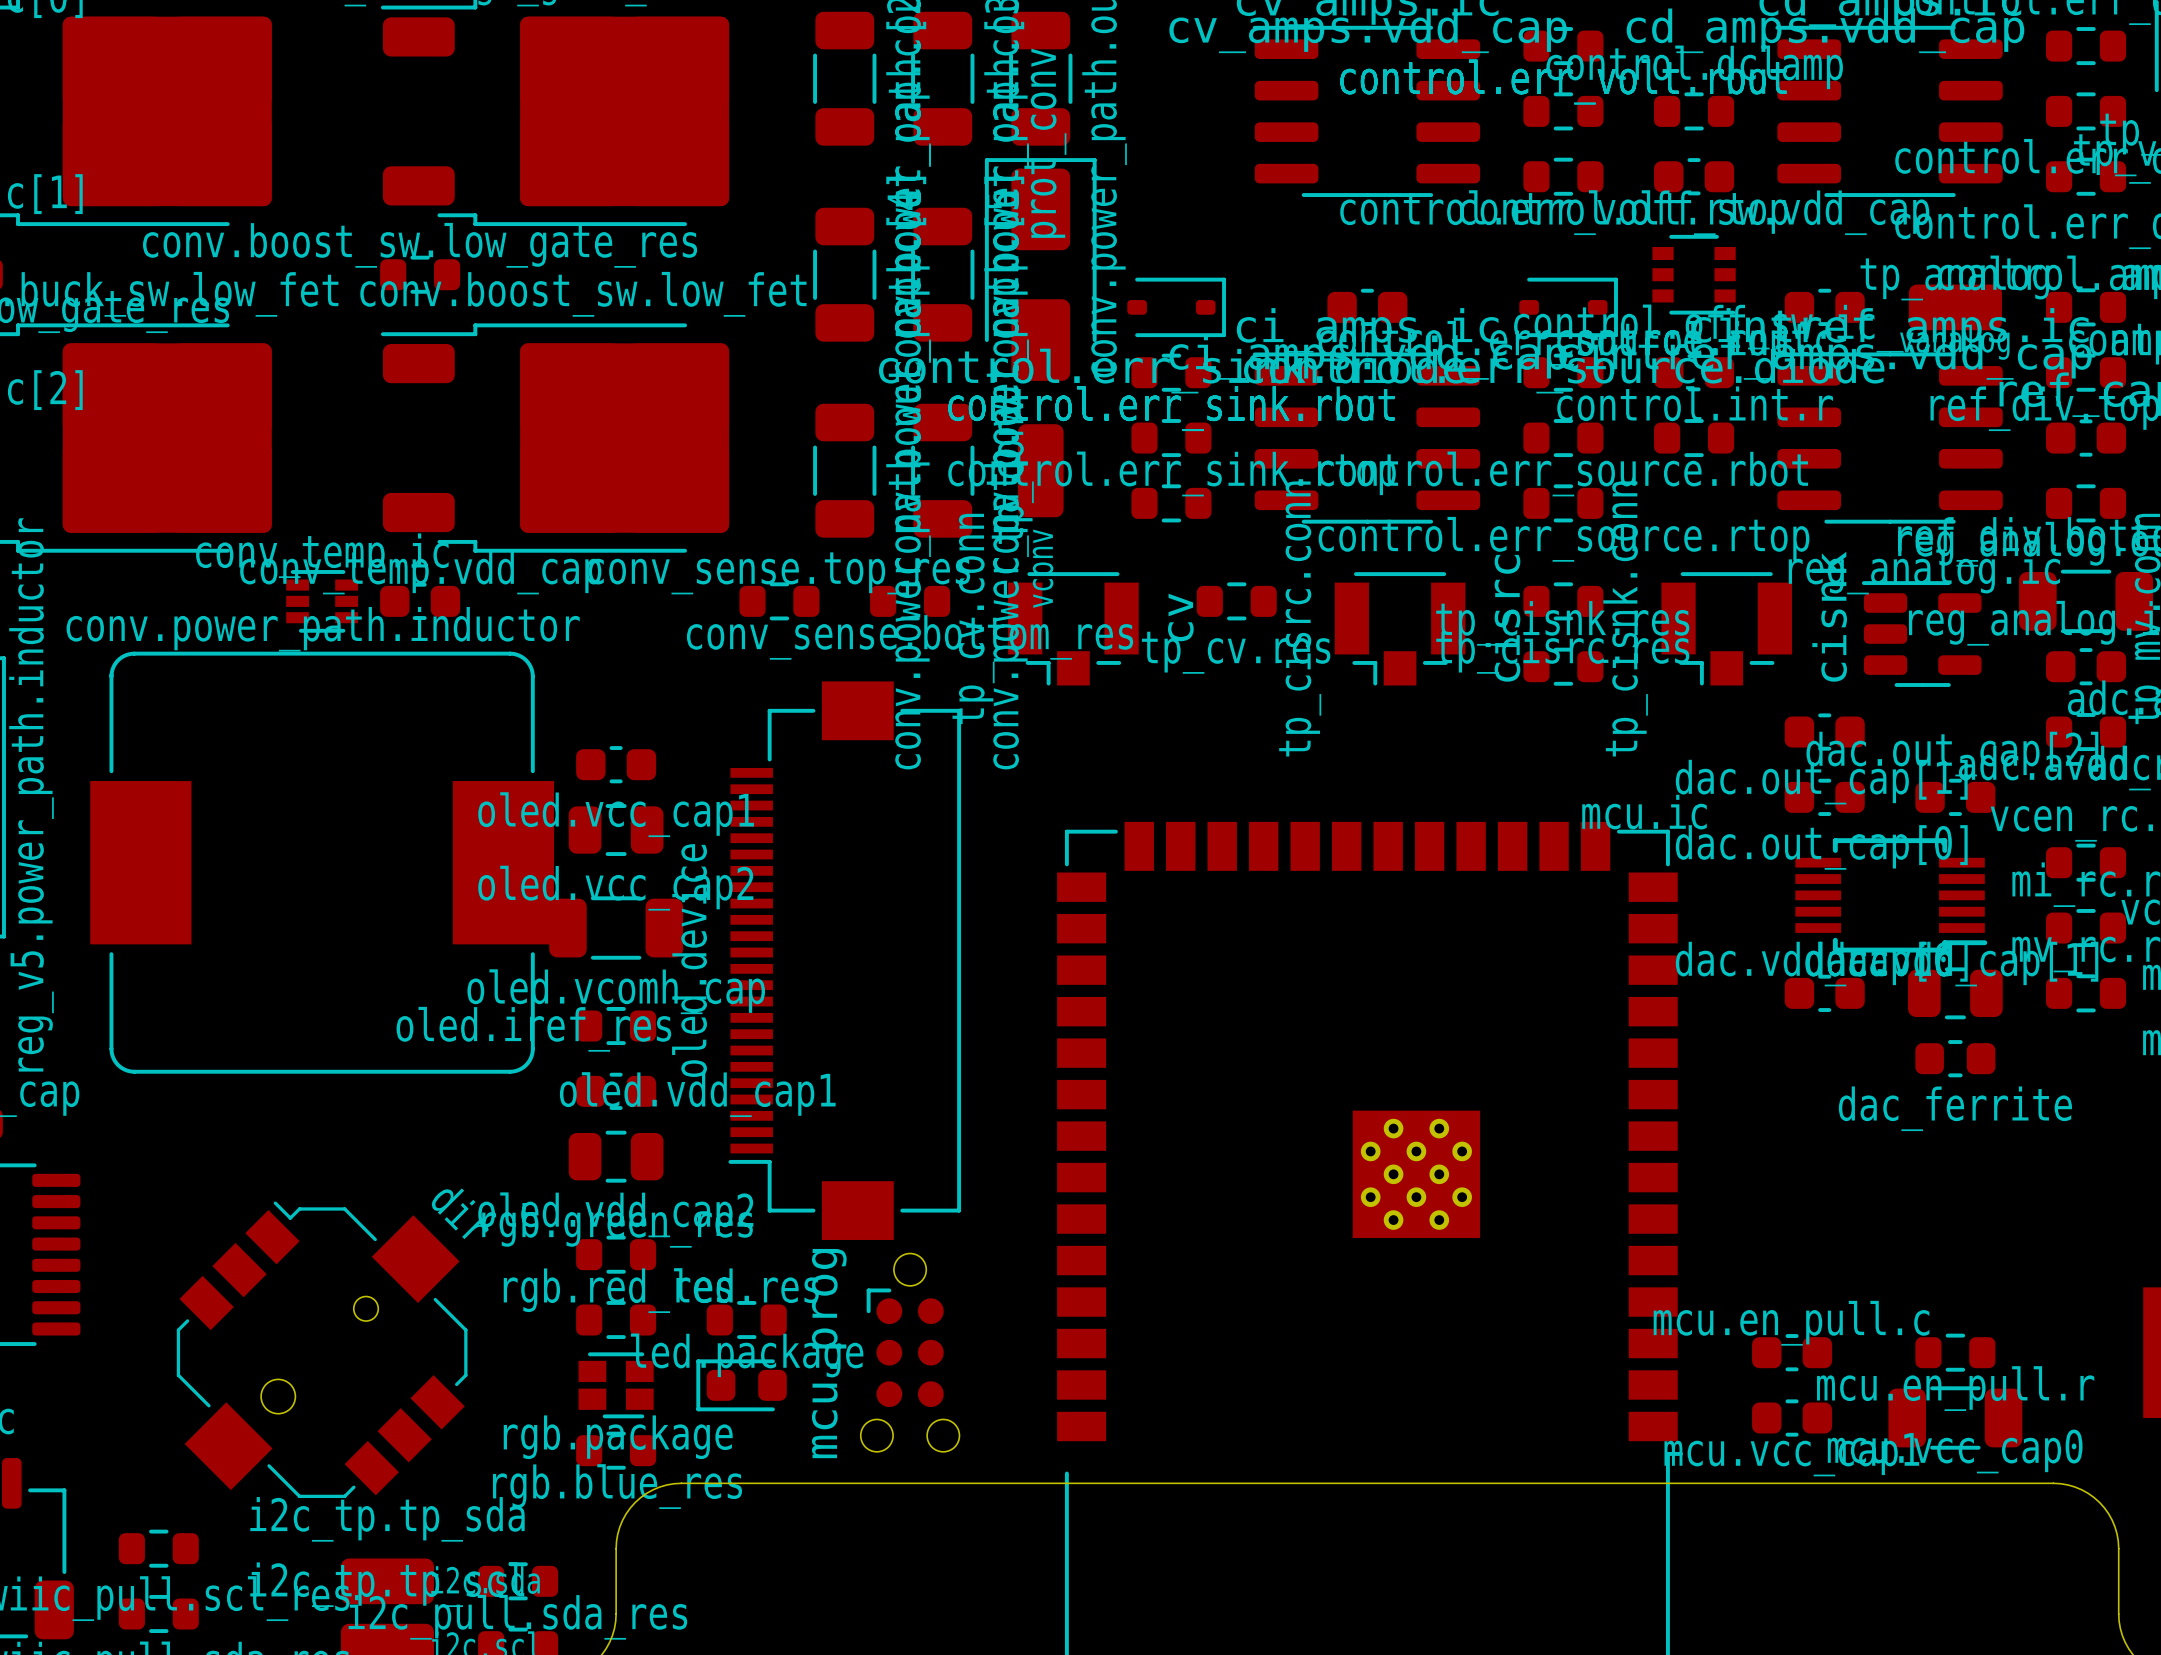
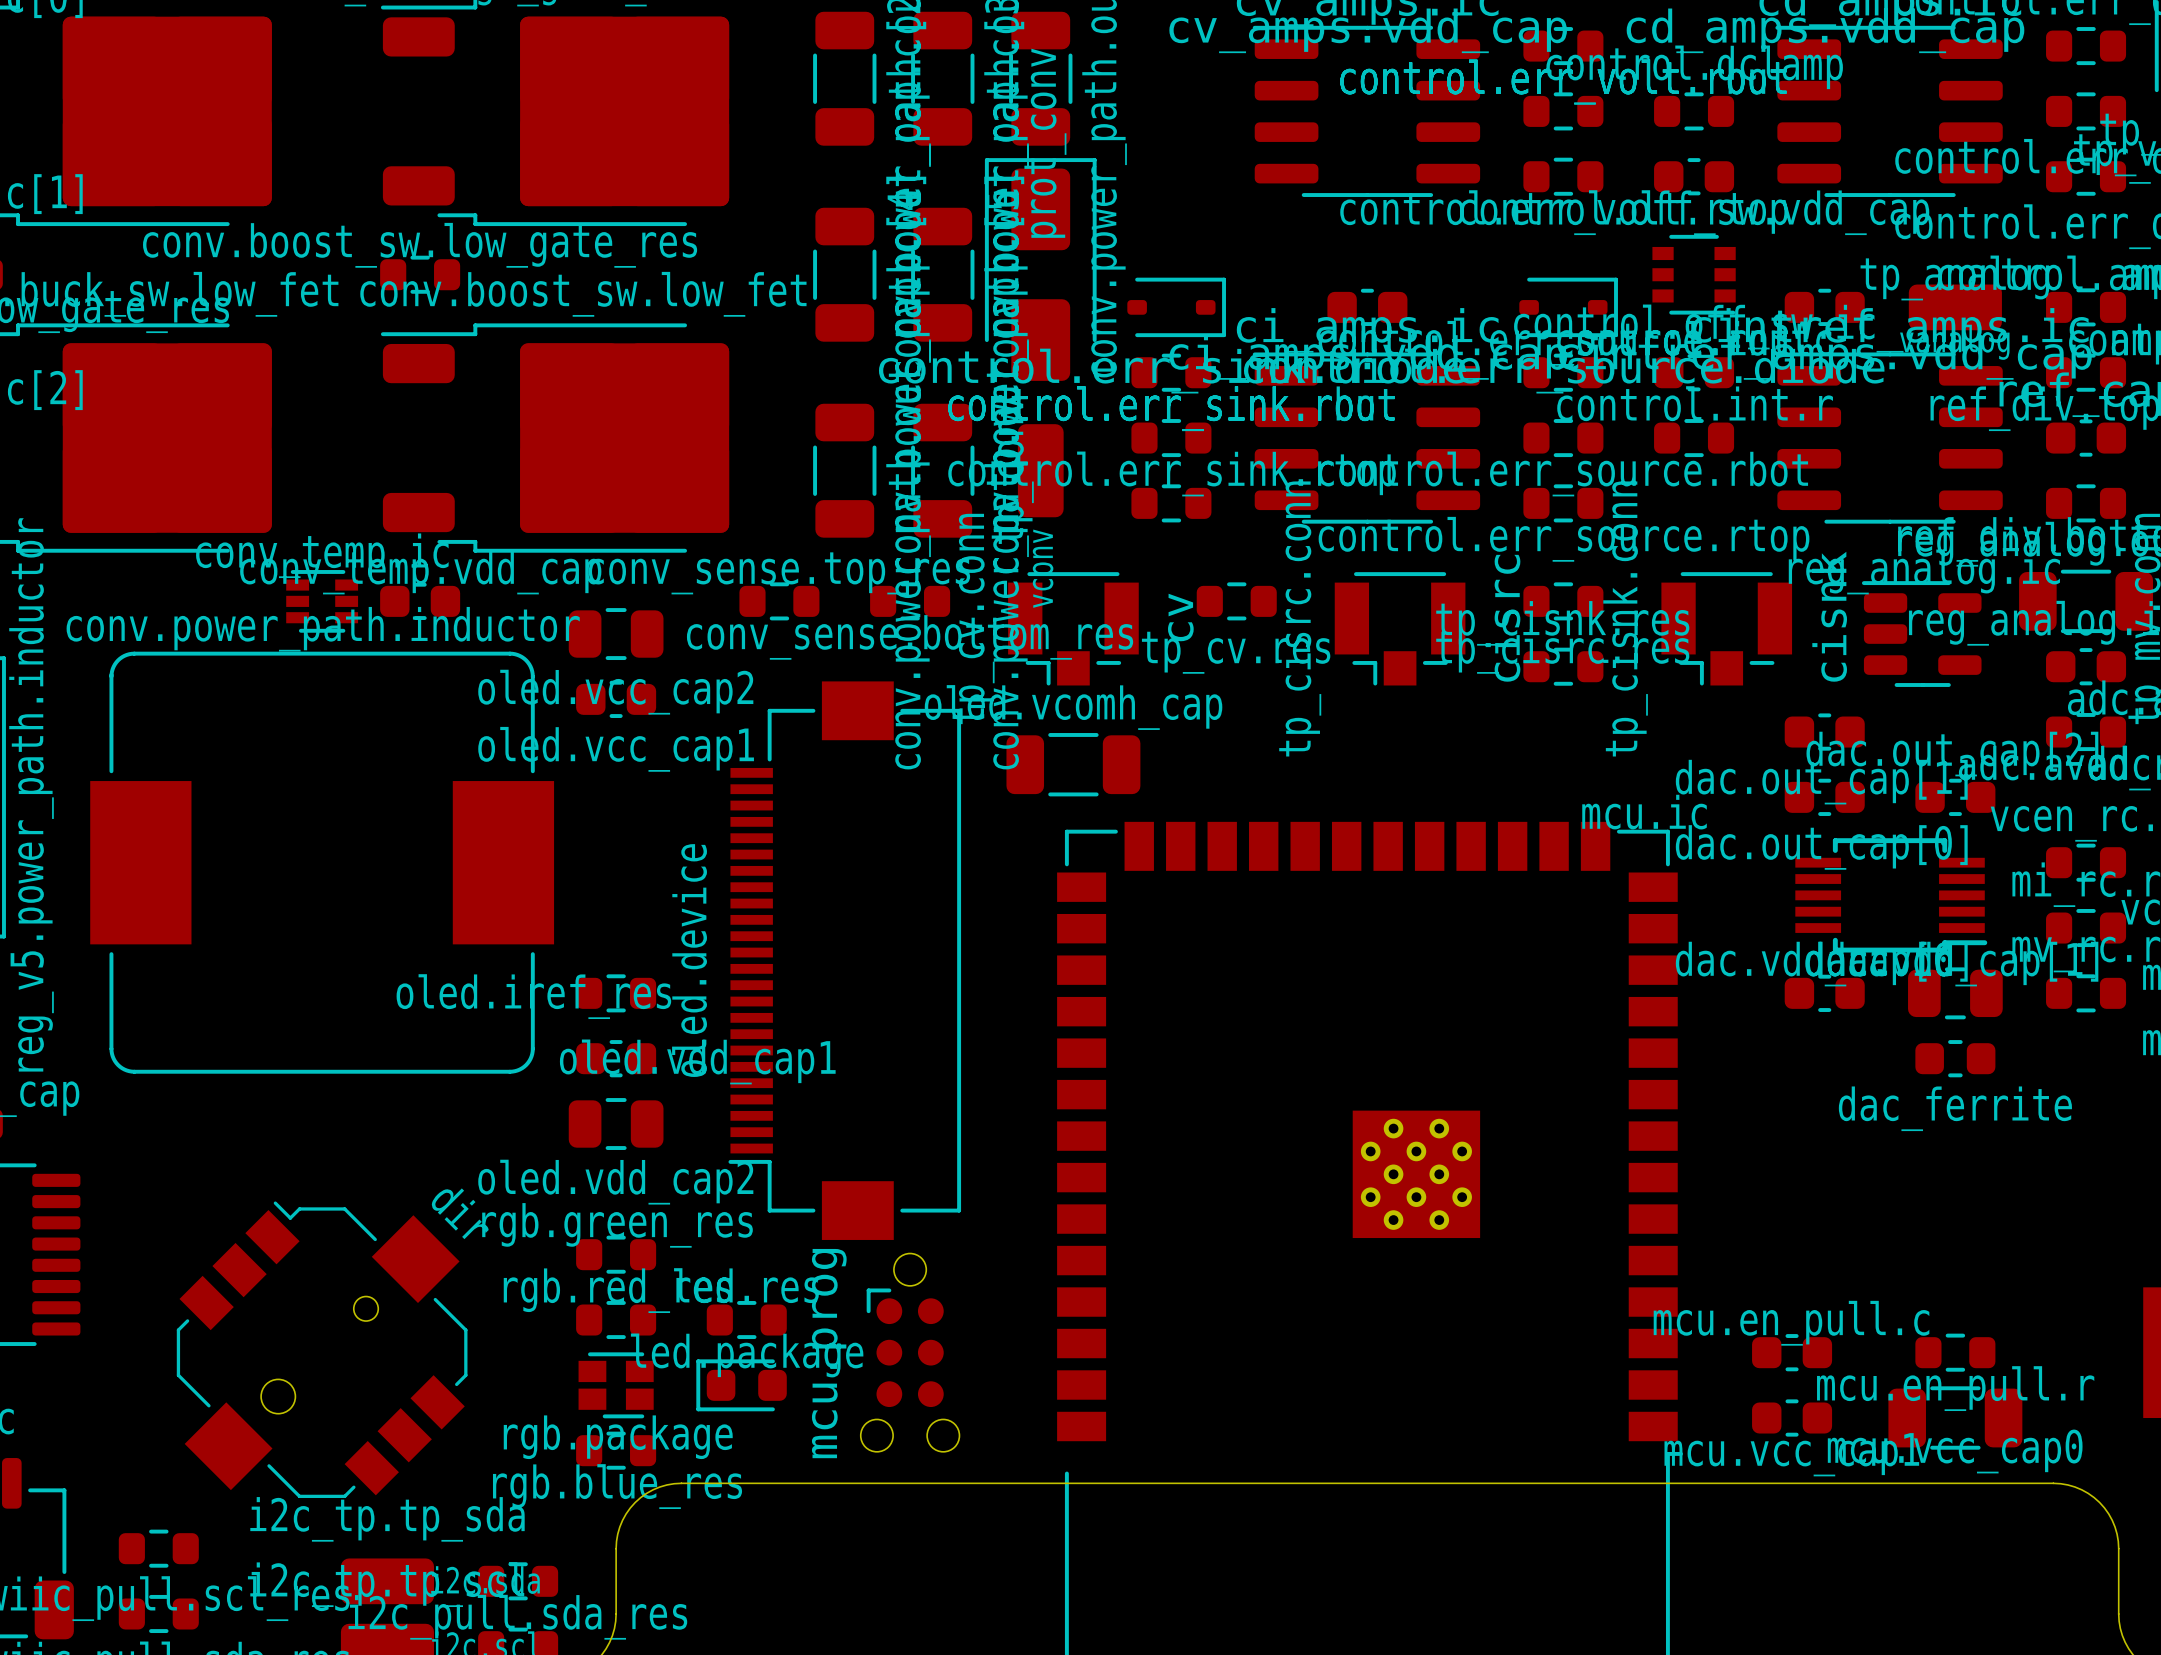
oled.vcc_cap1 position: (616, 764) -> (616, 699)
oled.vcc_cap2 position: (616, 830) -> (616, 634)
oled.vcomh_cap position: (616, 928) -> (1073, 764)
oled.vcomh_cap name position: oled.vcomh_cap (616, 991) -> oled.vcomh_cap (1073, 707)
oled.iref_res position: (616, 1026) -> (616, 993)
oled.vdd_cap1 position: (616, 1091) -> (616, 1058)
oled.vdd_cap2 position: (616, 1156) -> (616, 1124)

